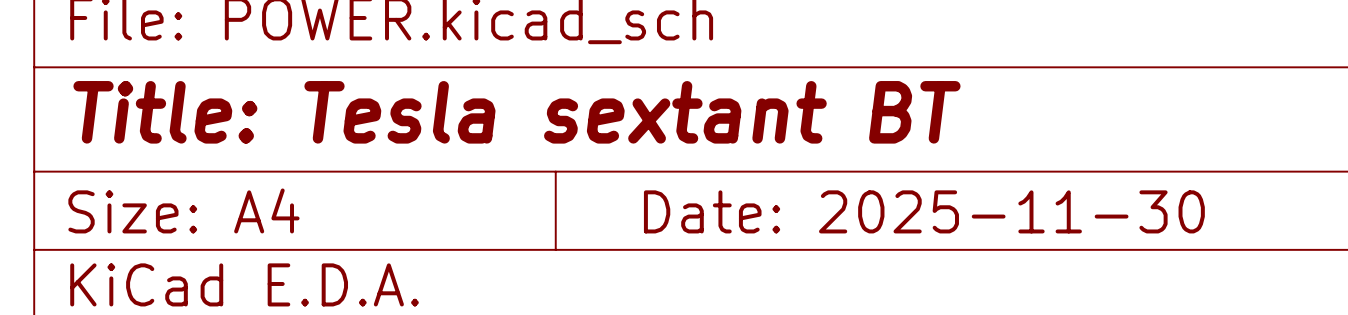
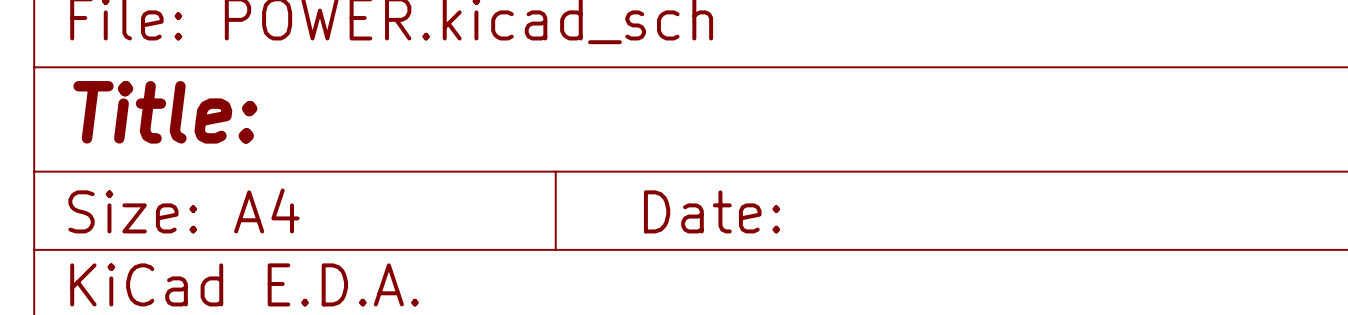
title block: Title: Tesla sextant BT (516, 112) -> Title: (165, 112)
title block: Date: 2025-11-30 (924, 211) -> Date: (712, 211)

